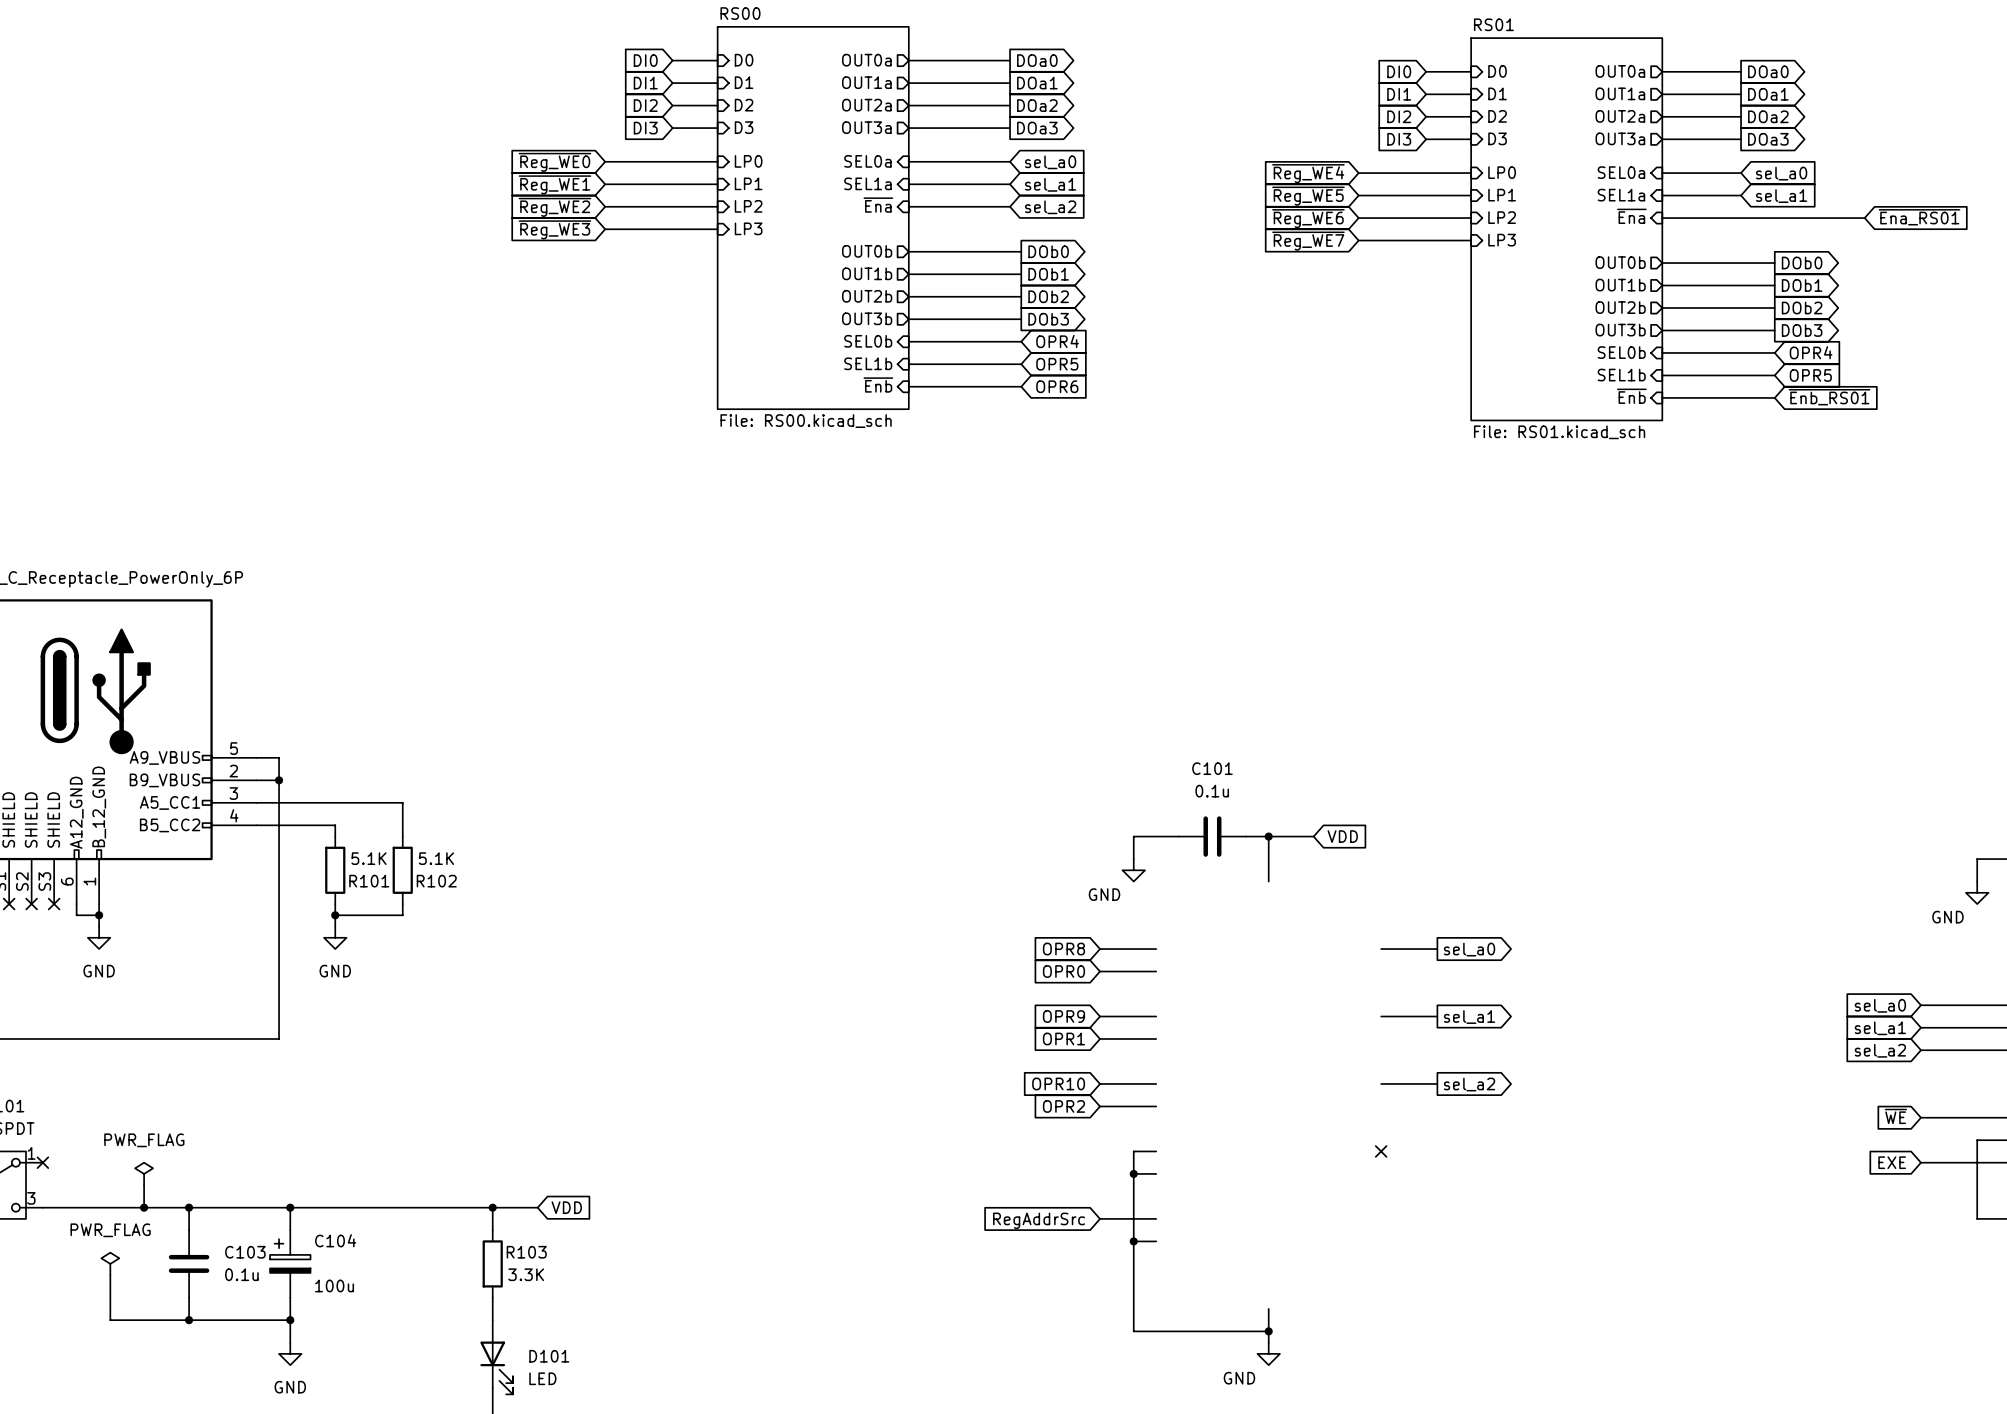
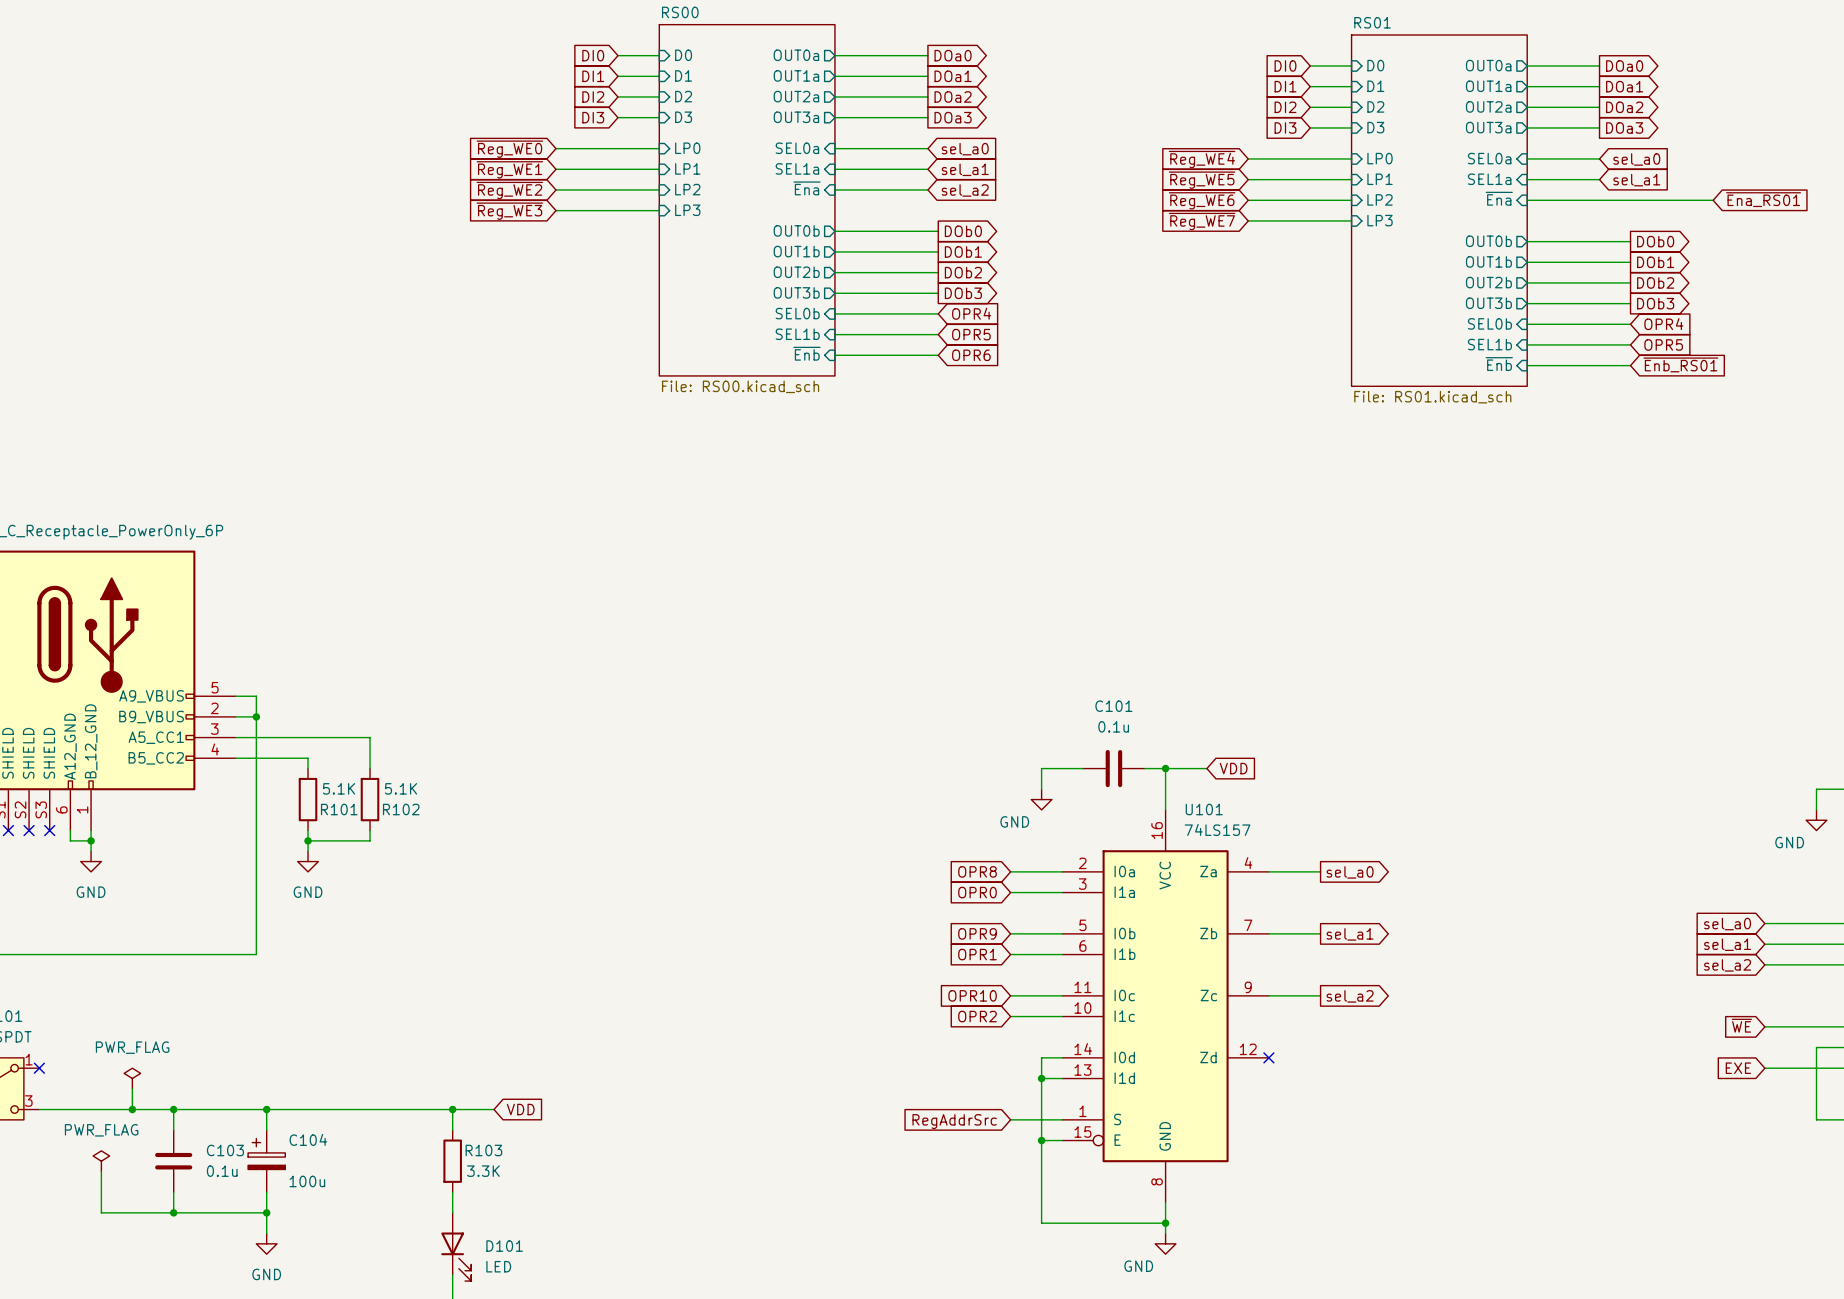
U101: none -> 74LS157 (1165, 1006)

